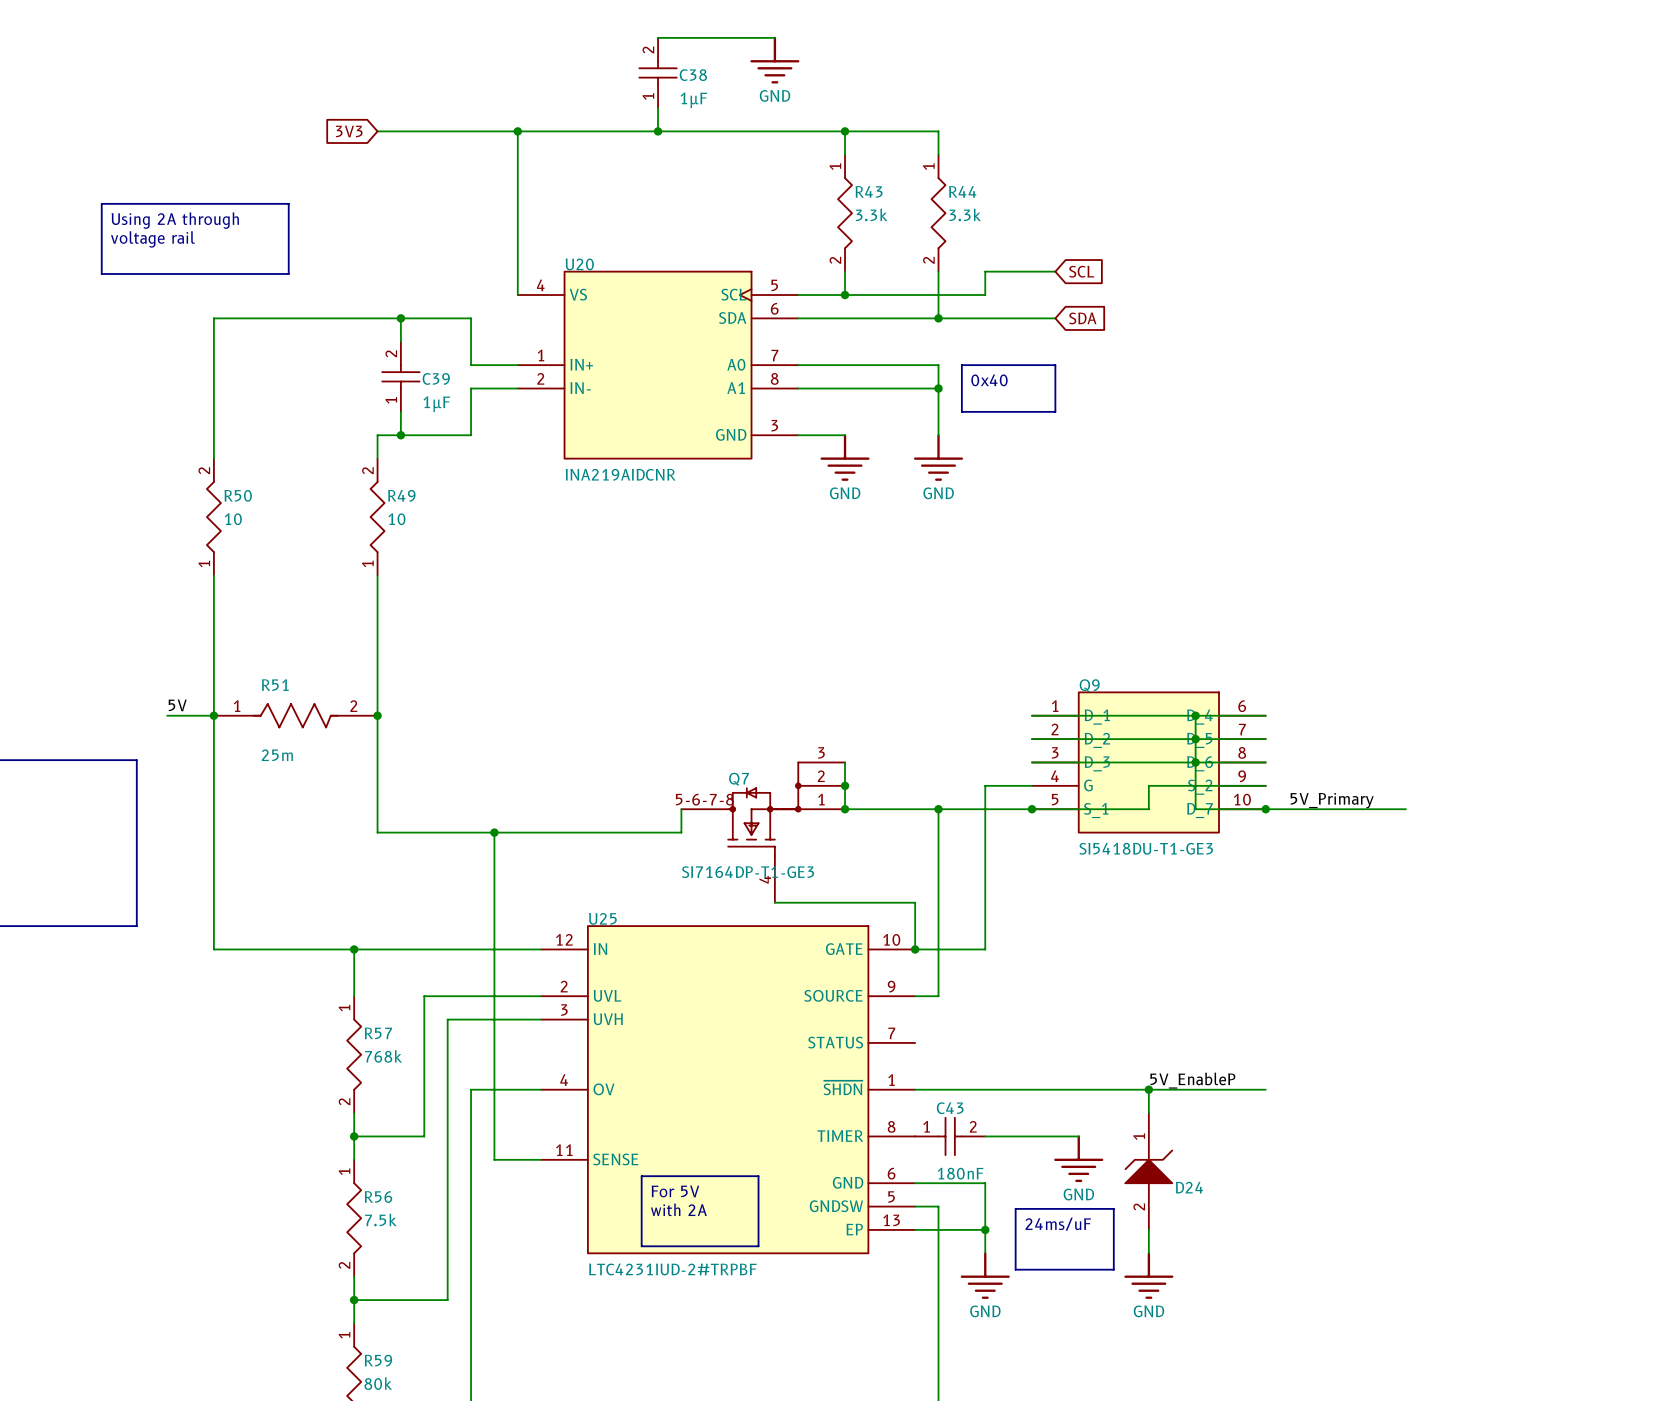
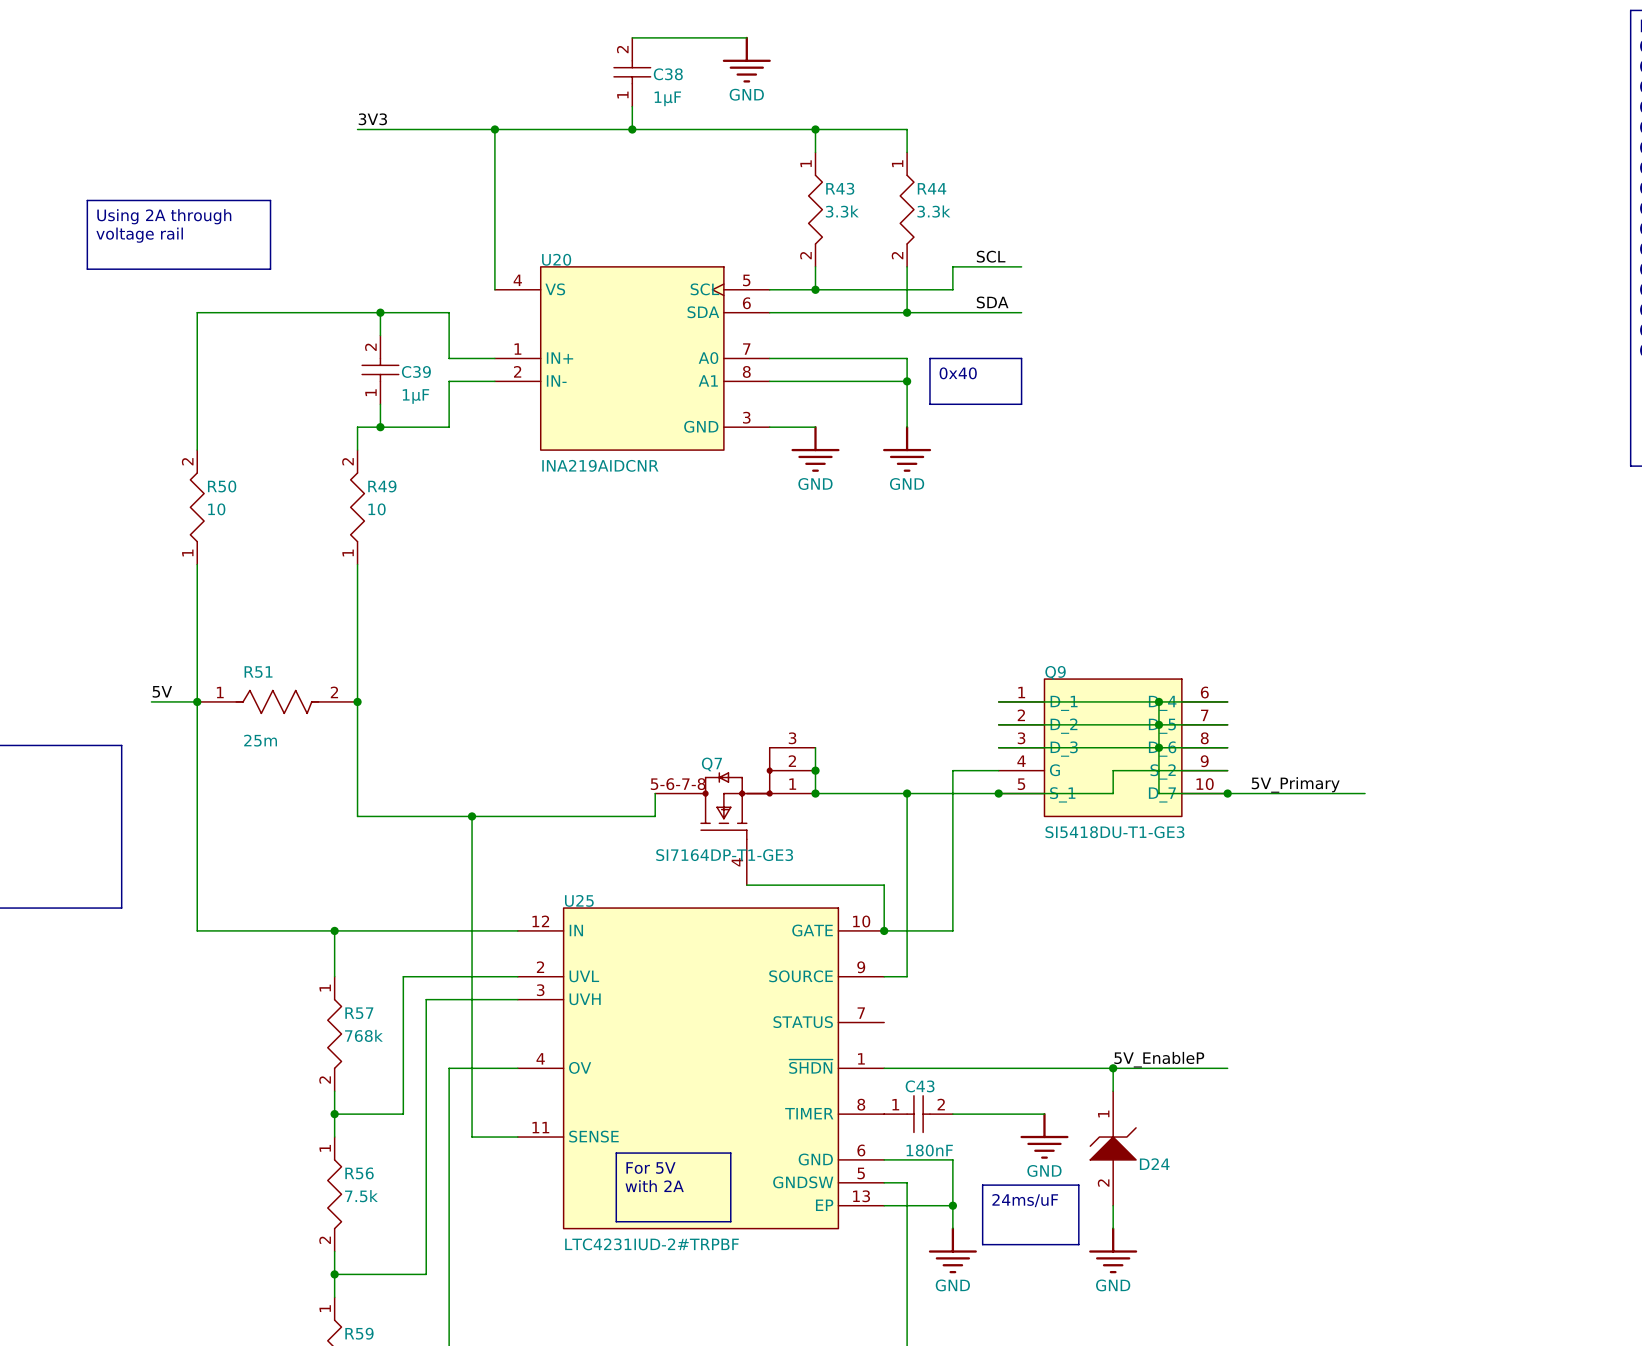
label: none -> 3V3 (372, 119)
global label: 3V3 (349, 131) -> none
label: none -> SCL (991, 256)
global label: SCL (1081, 271) -> none
label: none -> SDA (992, 302)
global label: SDA (1082, 318) -> none

